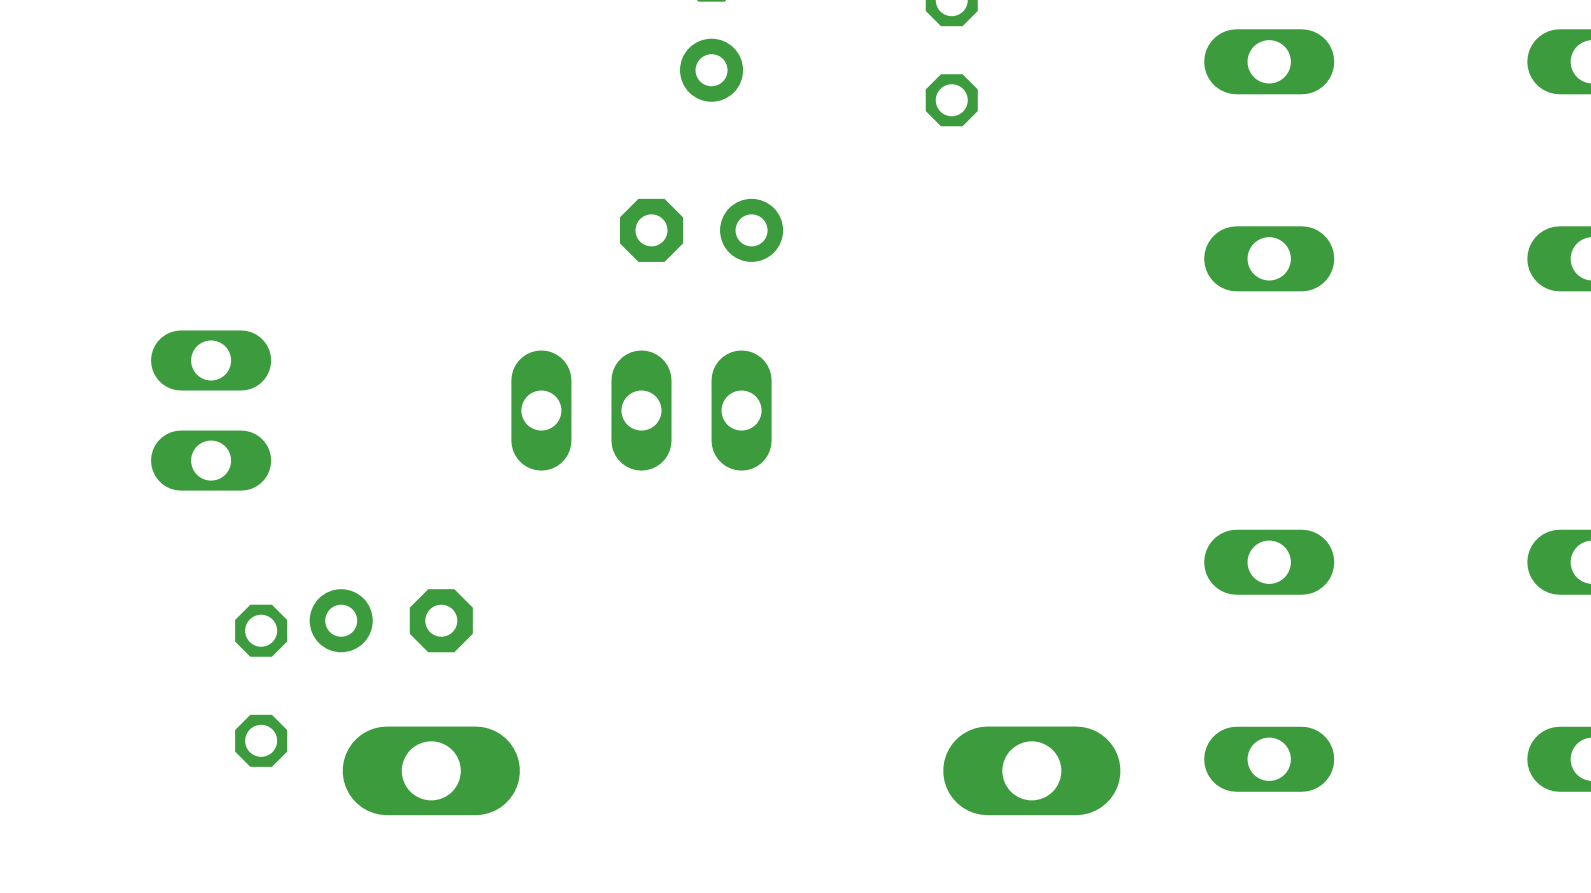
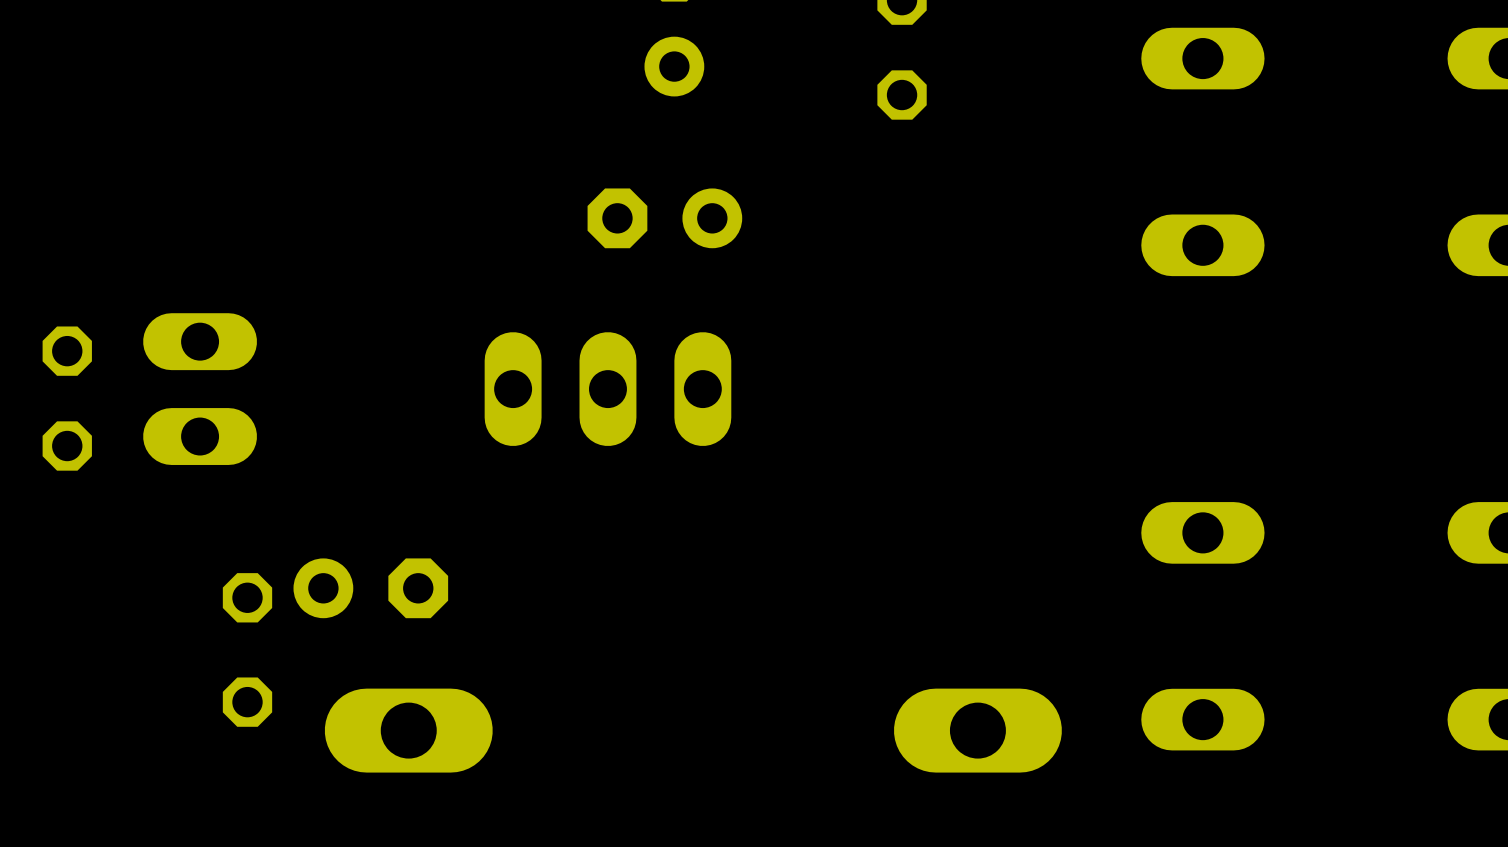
part: none -> (67, 398)

